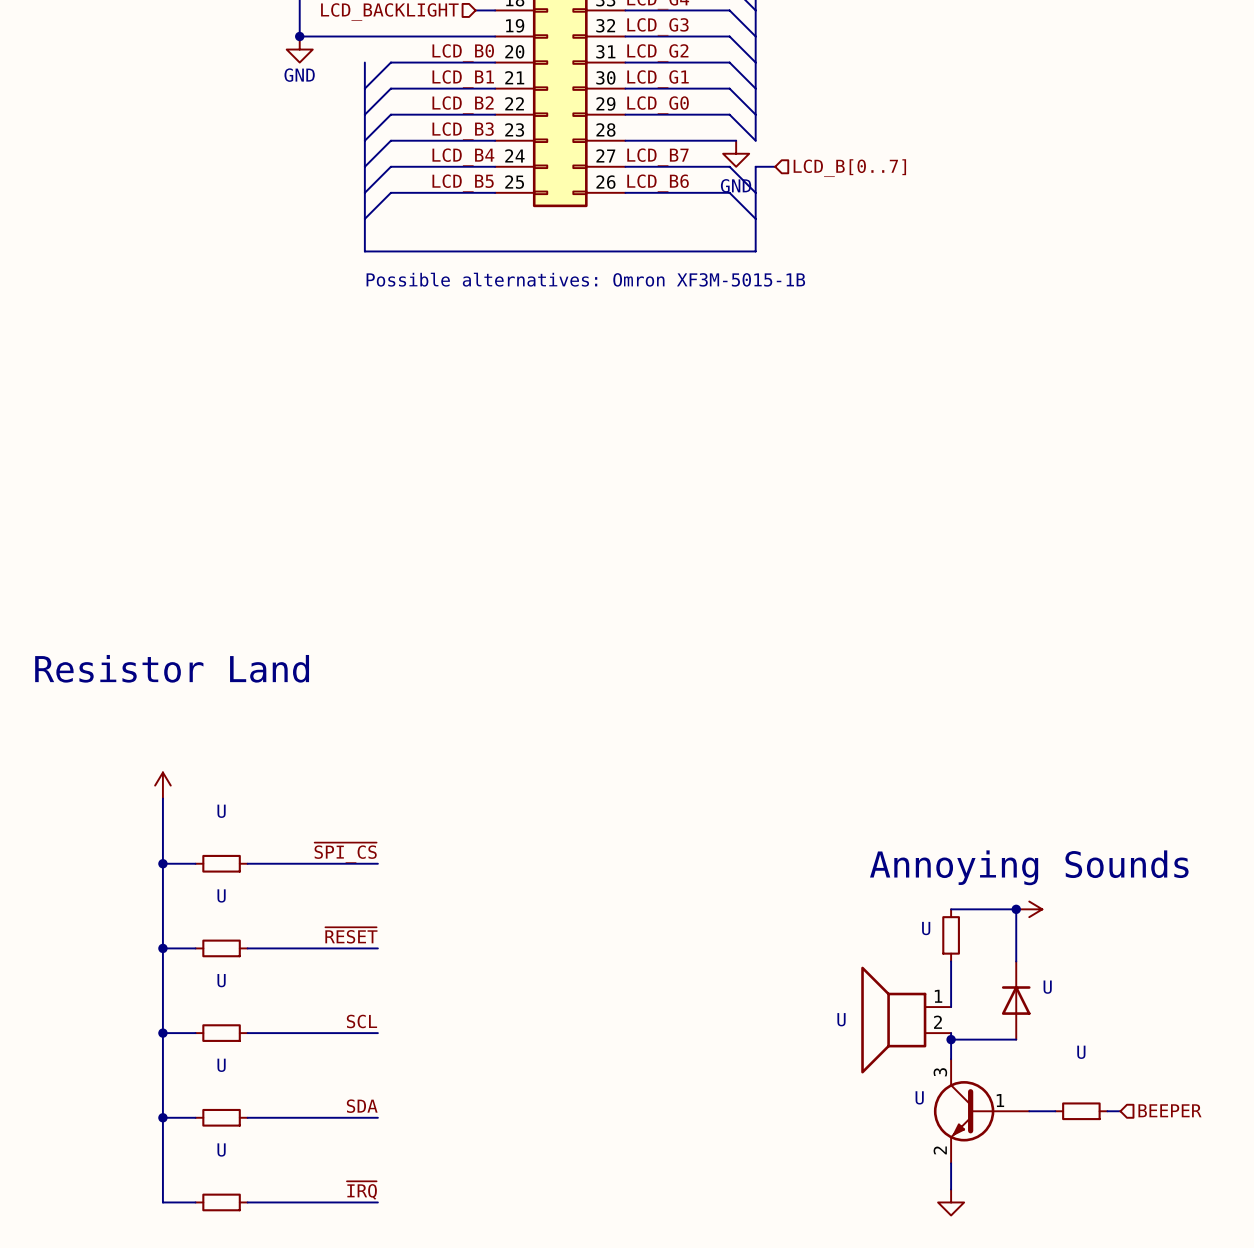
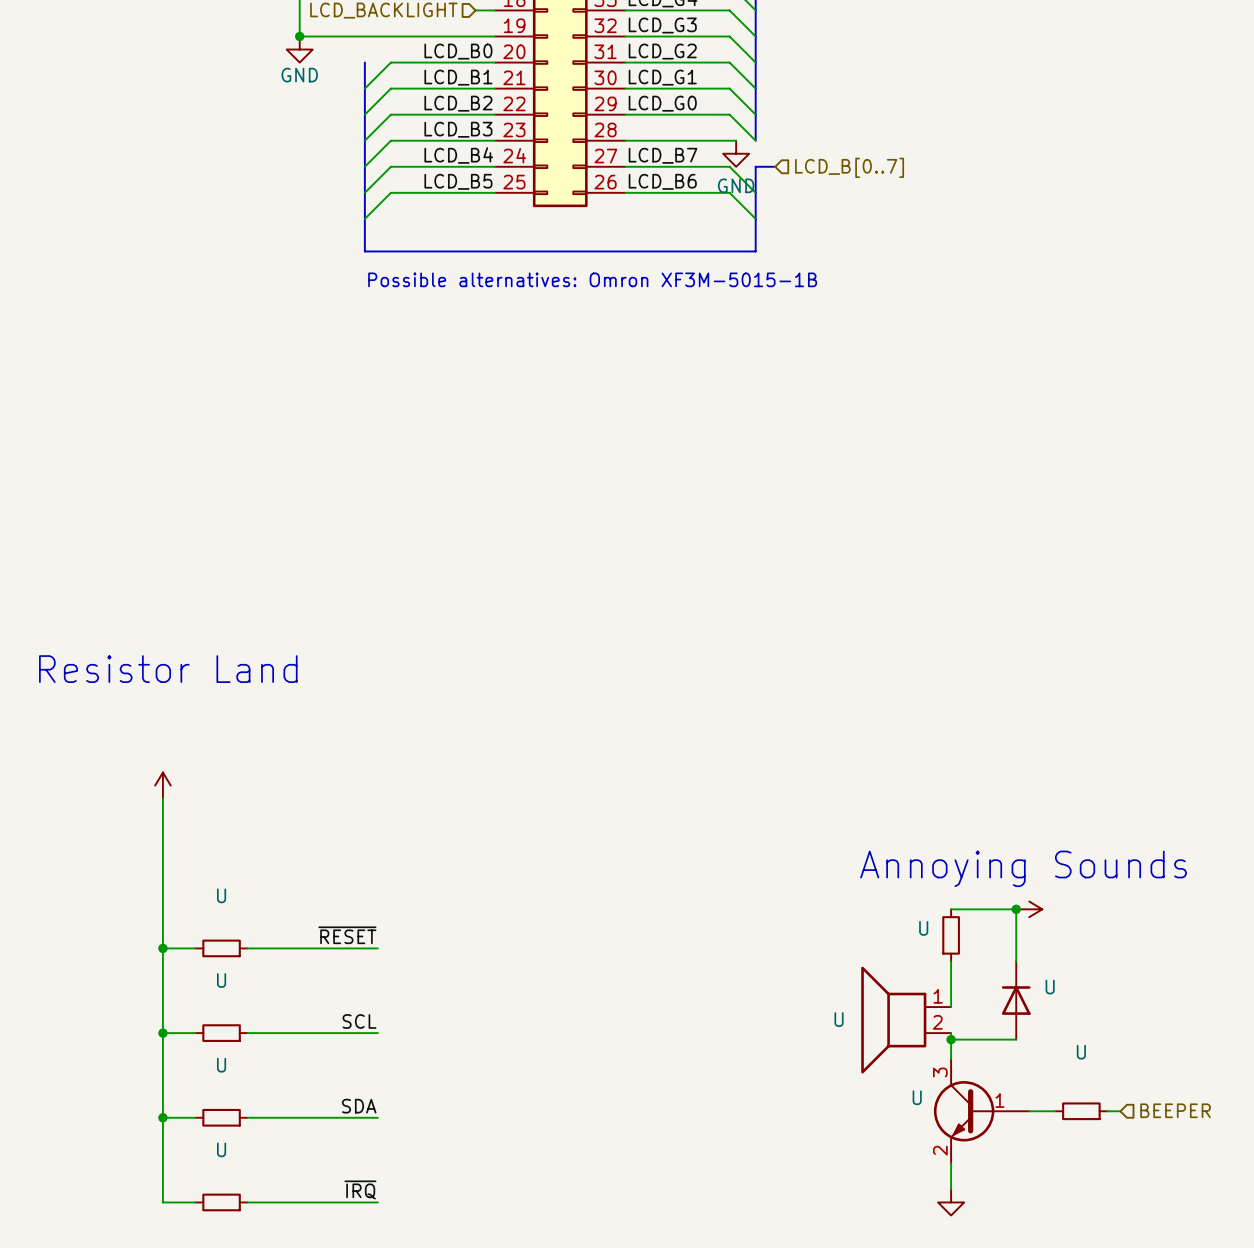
label: ~{SPI_CS} (345, 852) -> none
wire: (162, 863) (195, 863) -> none
junction: (162, 863) -> none
U: (221, 863) -> none
wire: (247, 863) (377, 863) -> none

